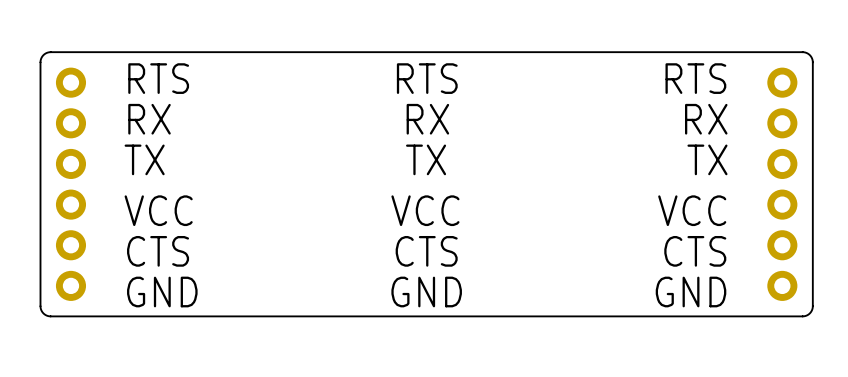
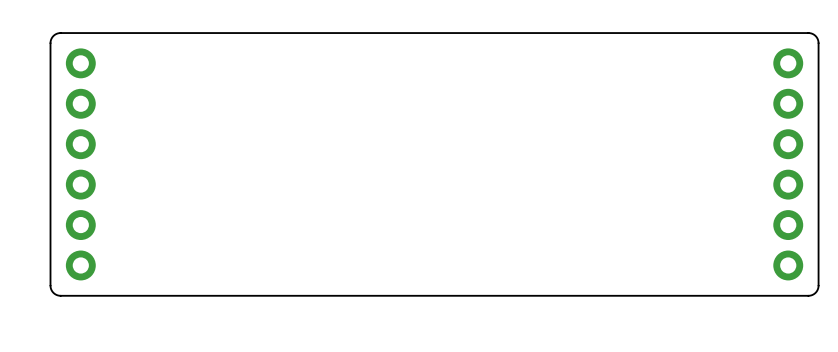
text: RTS (158, 78) -> none
text: RTS (427, 78) -> none
text: RTS (695, 78) -> none
text: RX (149, 119) -> none
text: RX (427, 119) -> none
text: RX (706, 119) -> none
text: TX (144, 159) -> none
text: TX (426, 159) -> none
text: TX (707, 159) -> none
text: VCC (158, 210) -> none
text: VCC (425, 210) -> none
text: VCC (692, 210) -> none
text: CTS (158, 251) -> none
text: CTS (426, 251) -> none
text: CTS (695, 251) -> none
text: GND (162, 292) -> none
text: GND (426, 292) -> none
text: GND (691, 292) -> none

